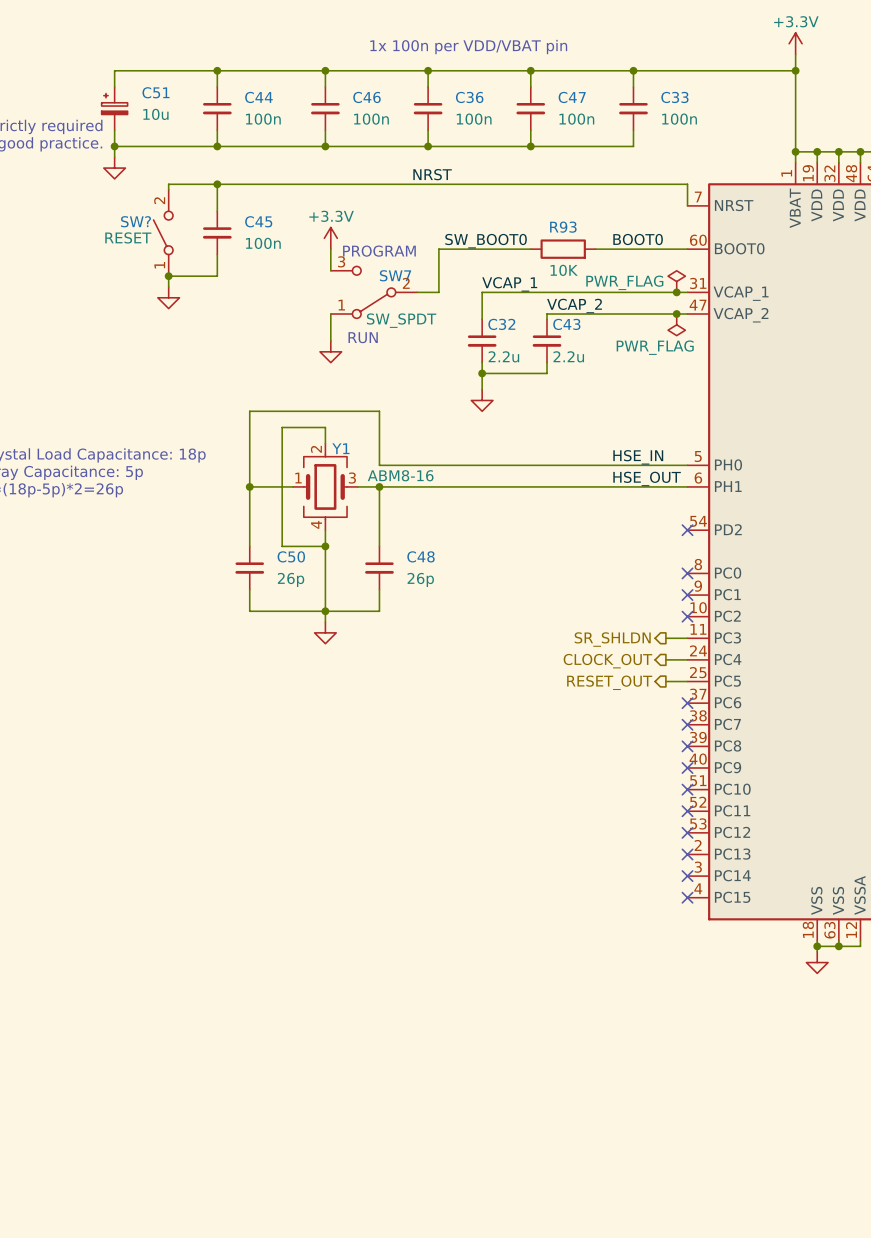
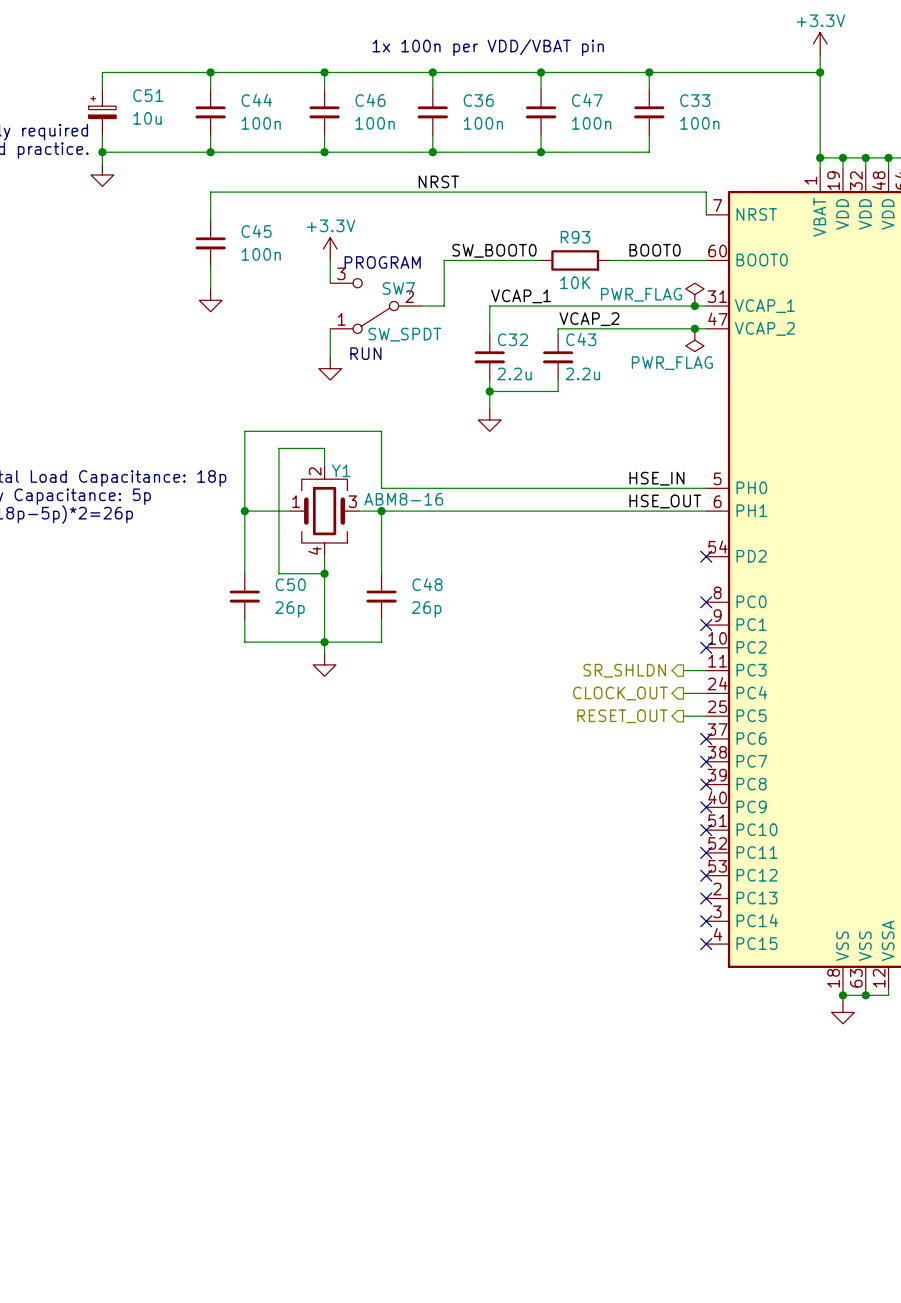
wire: (217, 184) (168, 184) (168, 189) -> none
junction: (217, 184) -> none
SW?: RESET (163, 232) -> none
junction: (168, 276) -> none
wire: (217, 276) (168, 276) (168, 286) -> none
power symbol position: (168, 297) -> (210, 300)

